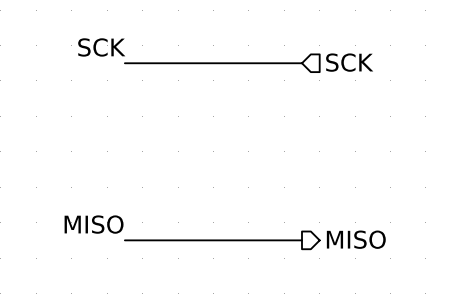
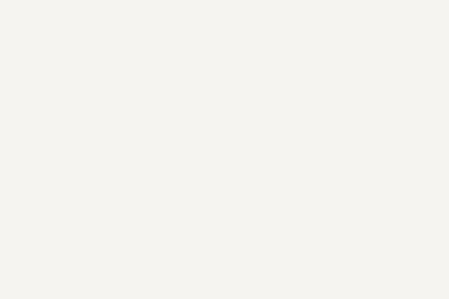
label: SCK (101, 47) -> none
hierarchical label: SCK (349, 62) -> none
wire: (124, 63) (301, 63) -> none
label: MISO (94, 224) -> none
hierarchical label: MISO (356, 239) -> none
wire: (124, 240) (301, 240) -> none

